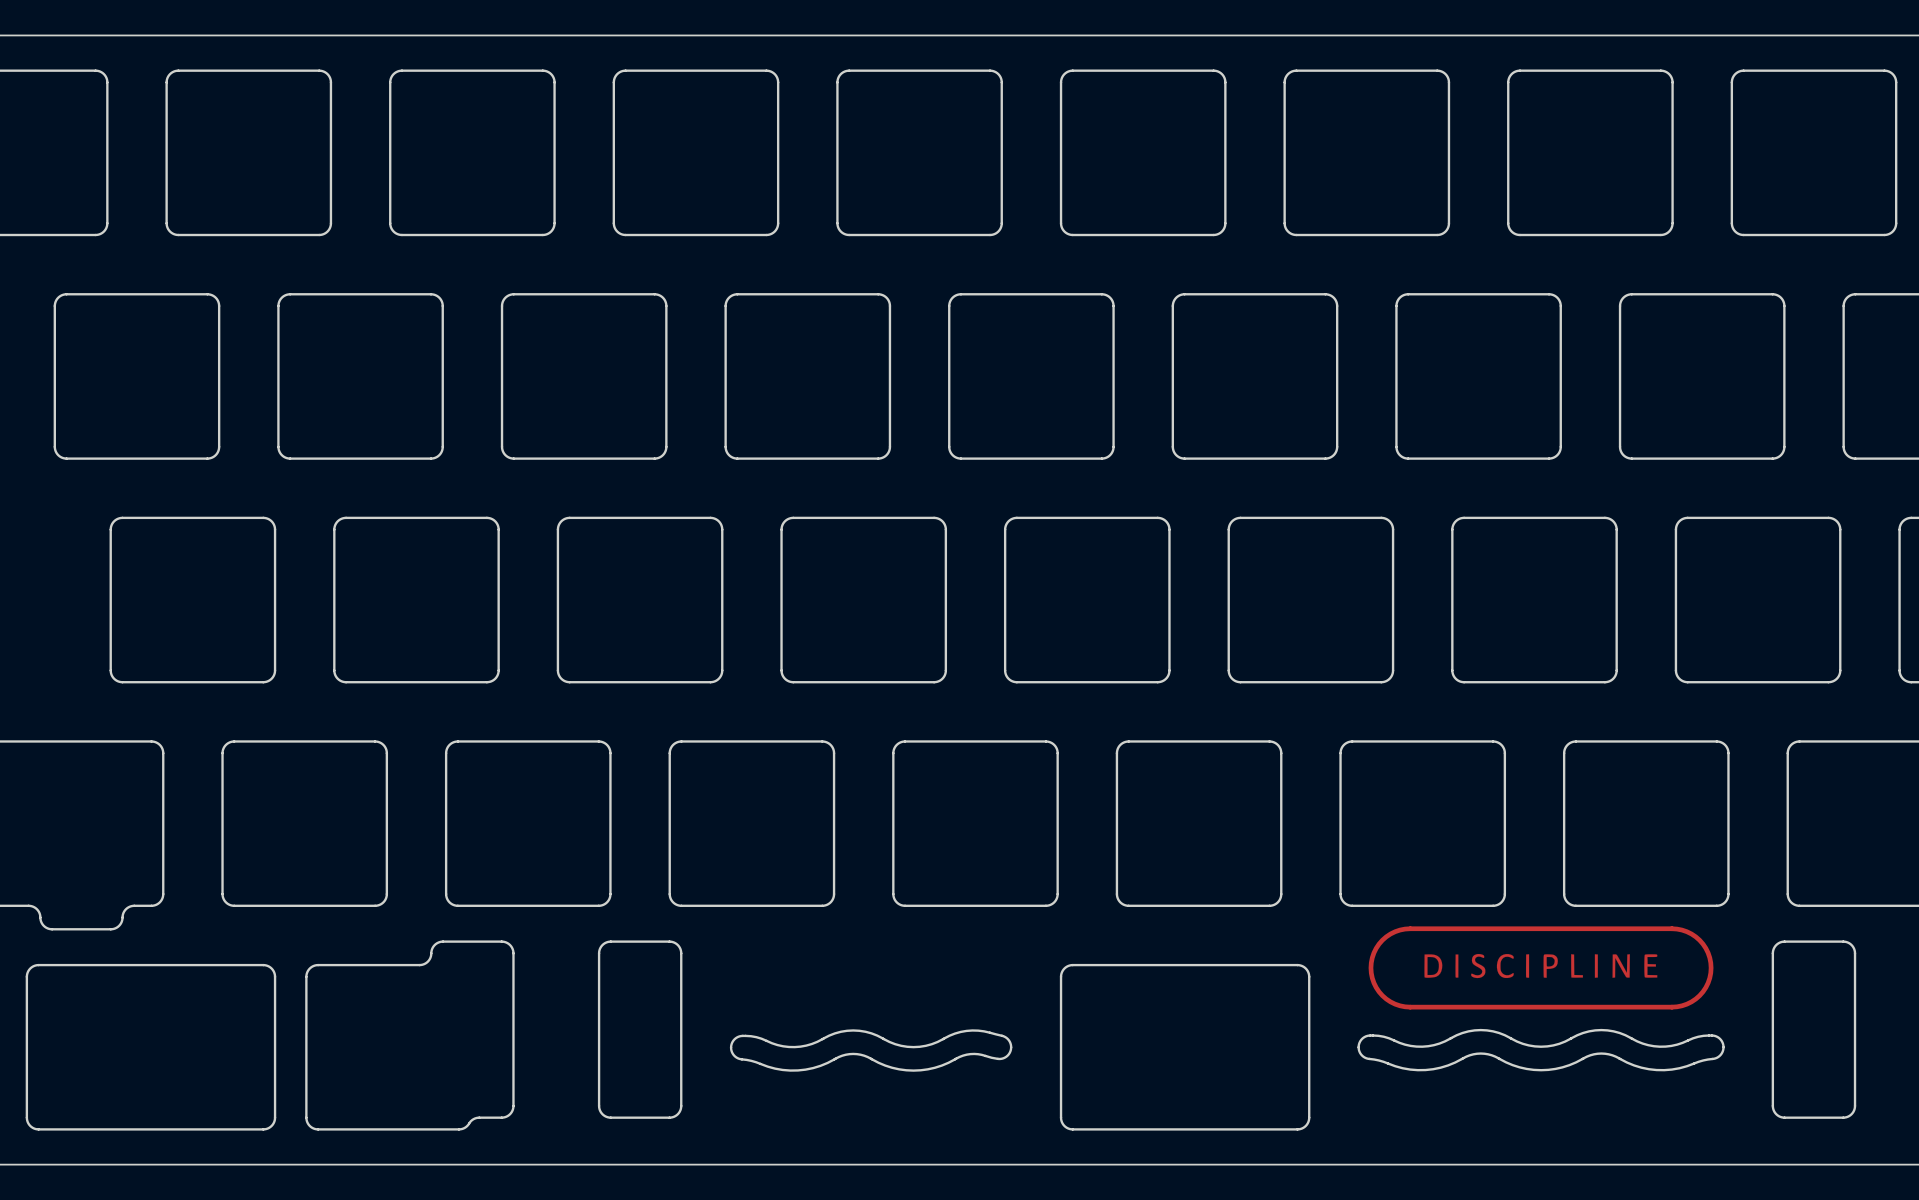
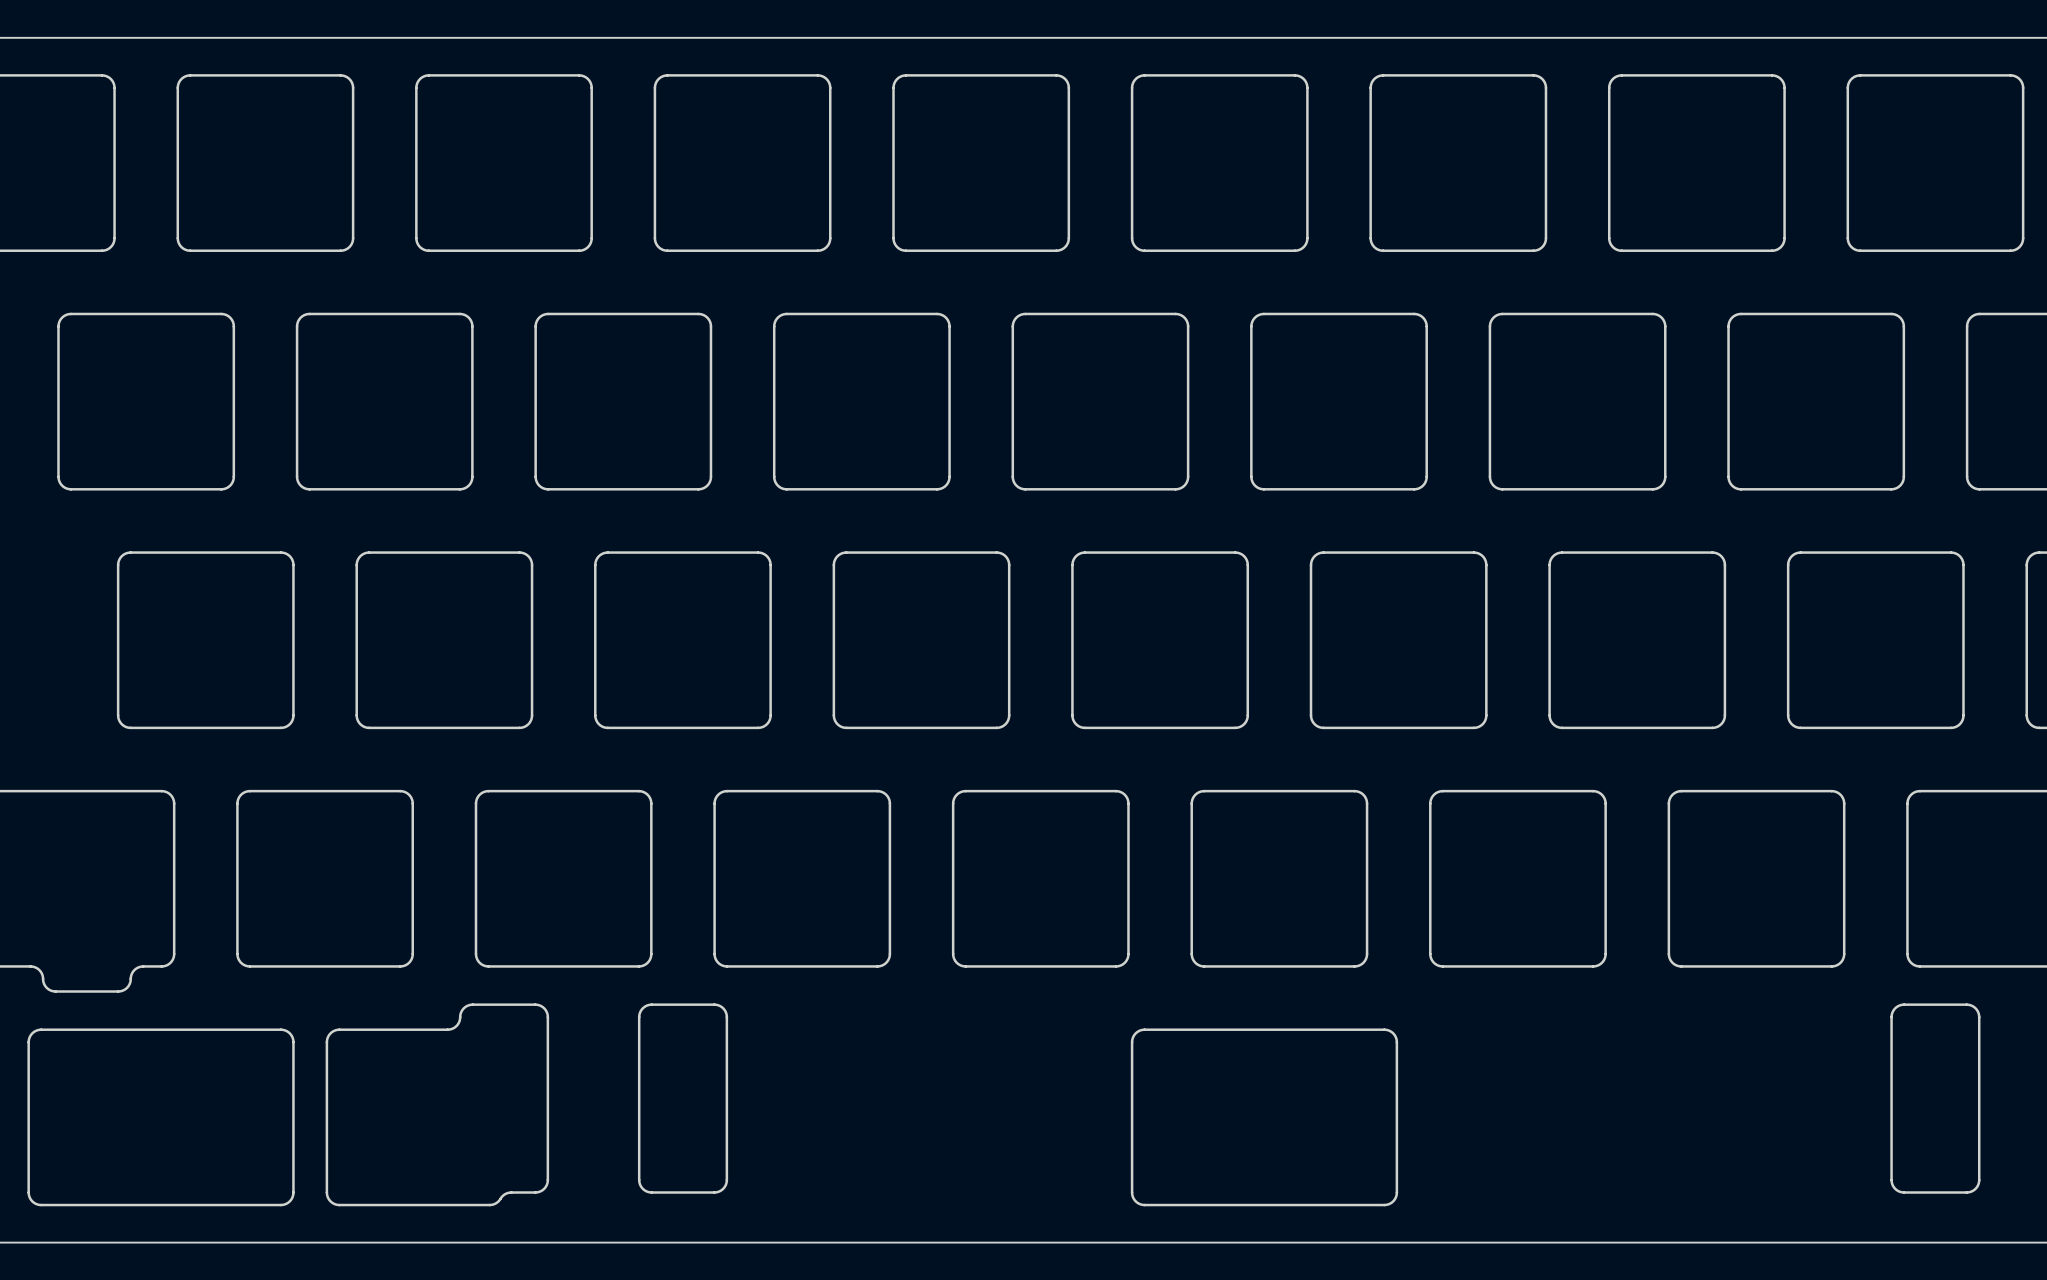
drawing: [1368, 926, 1714, 1010] -> none
board edge: (989, 1032) (978, 1030) (960, 1031) (931, 1044) (913, 1047) (895, 1044) (871, 1033) (859, 1030) (840, 1031) (811, 1043) (794, 1047) (783, 1046) (756, 1037) (742, 1035) (734, 1039) (731, 1047) (733, 1054) (737, 1058) (782, 1069) (813, 1068) (842, 1055) (853, 1053) (864, 1055) (892, 1067) (920, 1070) (941, 1065) (966, 1054) (978, 1054) (999, 1058) (1006, 1056) (1010, 1050) (1009, 1041) (1004, 1036) (989, 1032) -> none
board edge: (1370, 1035) (1383, 1036) (1410, 1045) (1422, 1046) (1439, 1043) (1468, 1031) (1486, 1030) (1499, 1032) (1522, 1043) (1541, 1046) (1559, 1043) (1583, 1032) (1601, 1030) (1619, 1032) (1642, 1043) (1659, 1046) (1677, 1044) (1698, 1036) (1713, 1035) (1721, 1040) (1723, 1047) (1721, 1054) (1715, 1058) (1679, 1068) (1664, 1070) (1641, 1067) (1612, 1055) (1601, 1053) (1590, 1055) (1562, 1067) (1533, 1069) (1519, 1067) (1491, 1055) (1480, 1053) (1469, 1055) (1440, 1067) (1417, 1070) (1402, 1068) (1363, 1057) (1359, 1051) (1359, 1044) (1363, 1037) (1370, 1035) -> none

